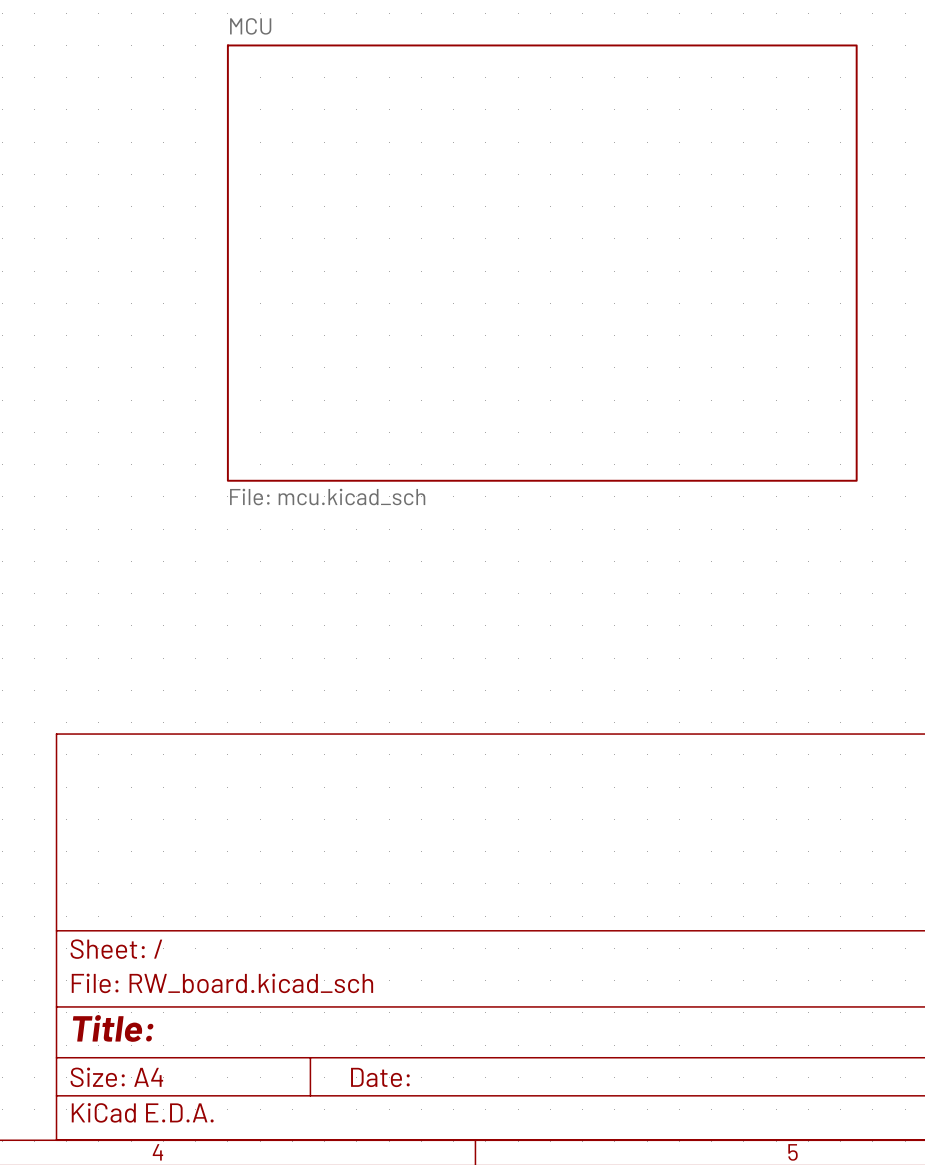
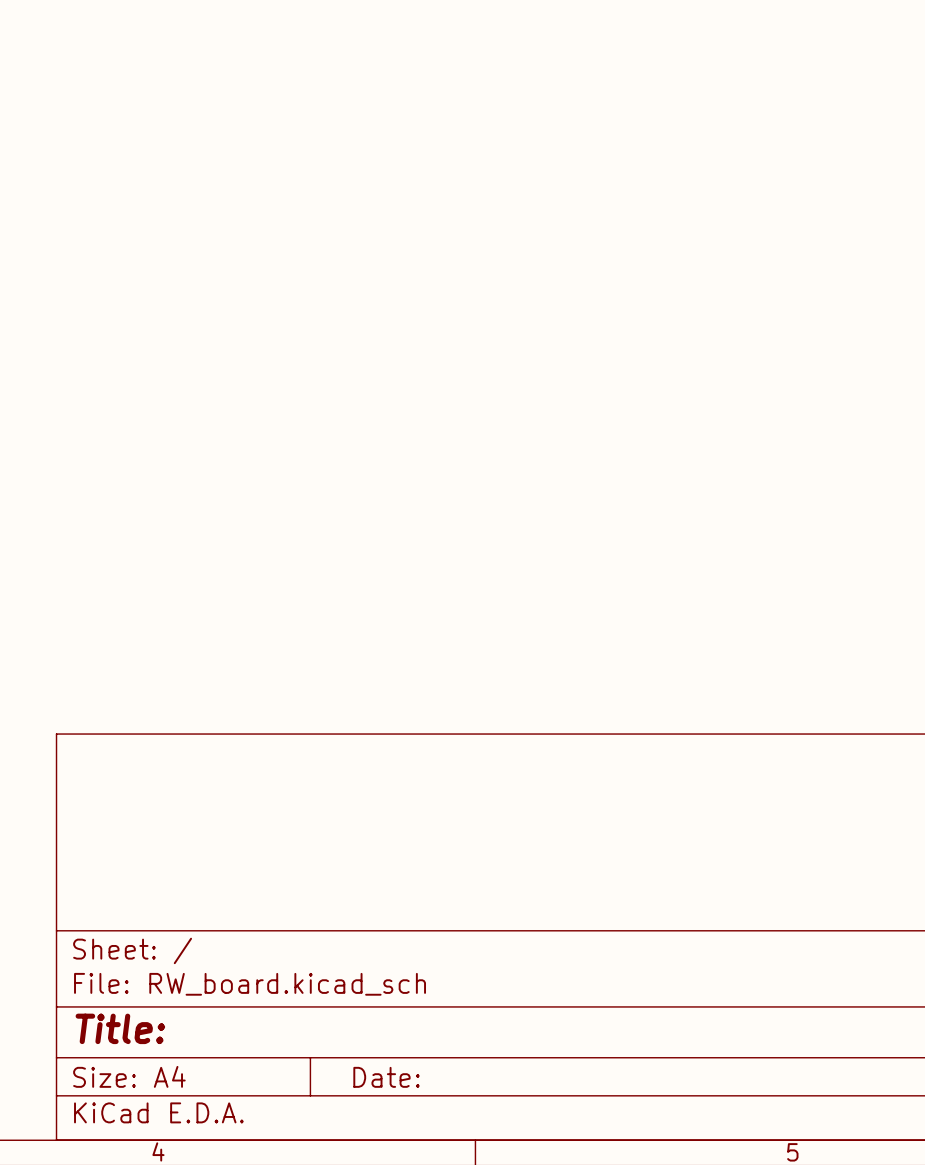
sheet MCU: File: mcu.kicad_sch (542, 263) -> none

